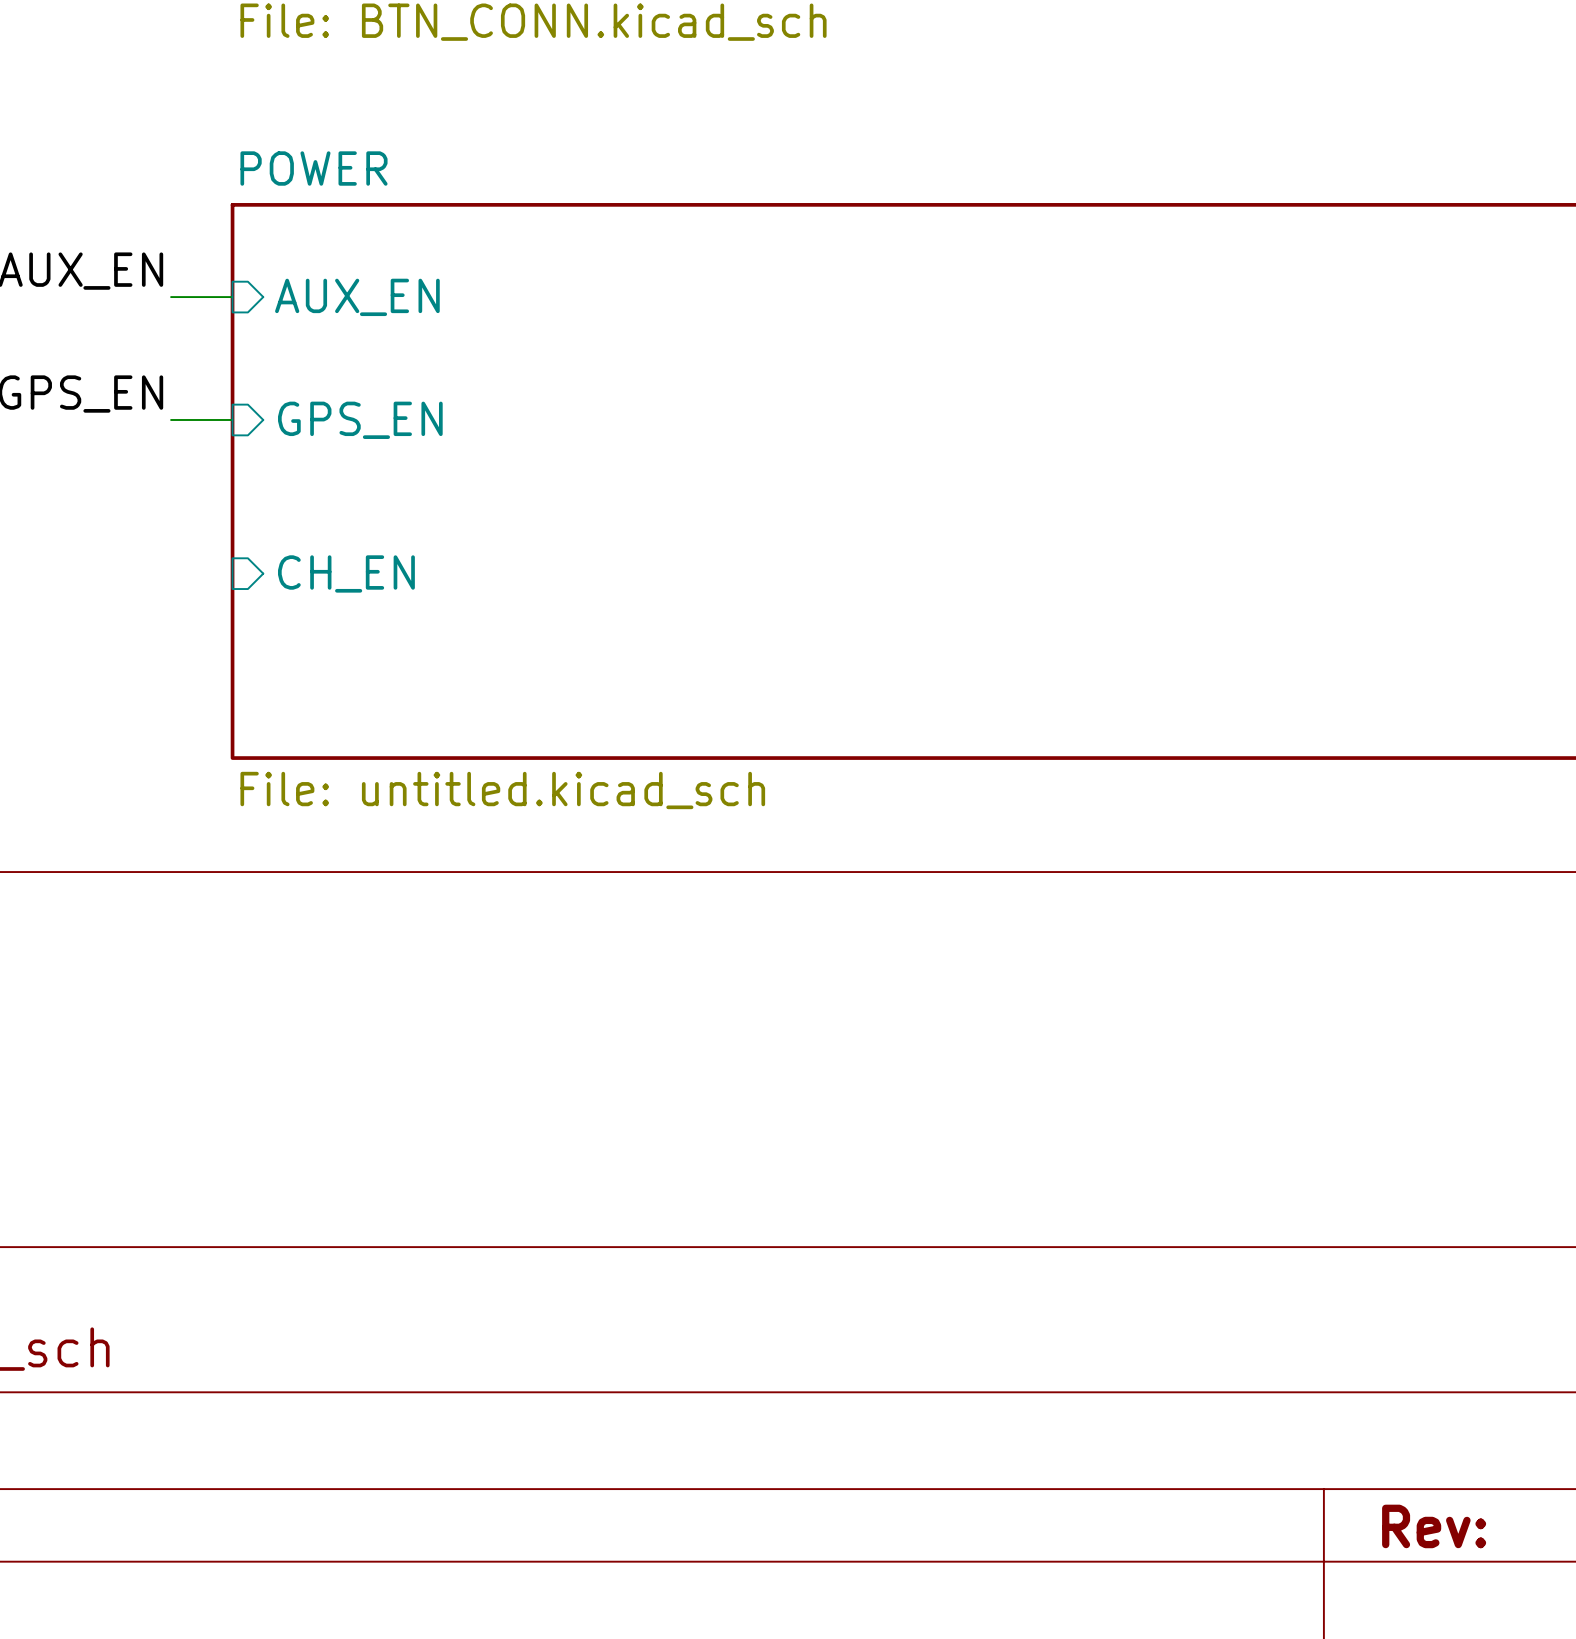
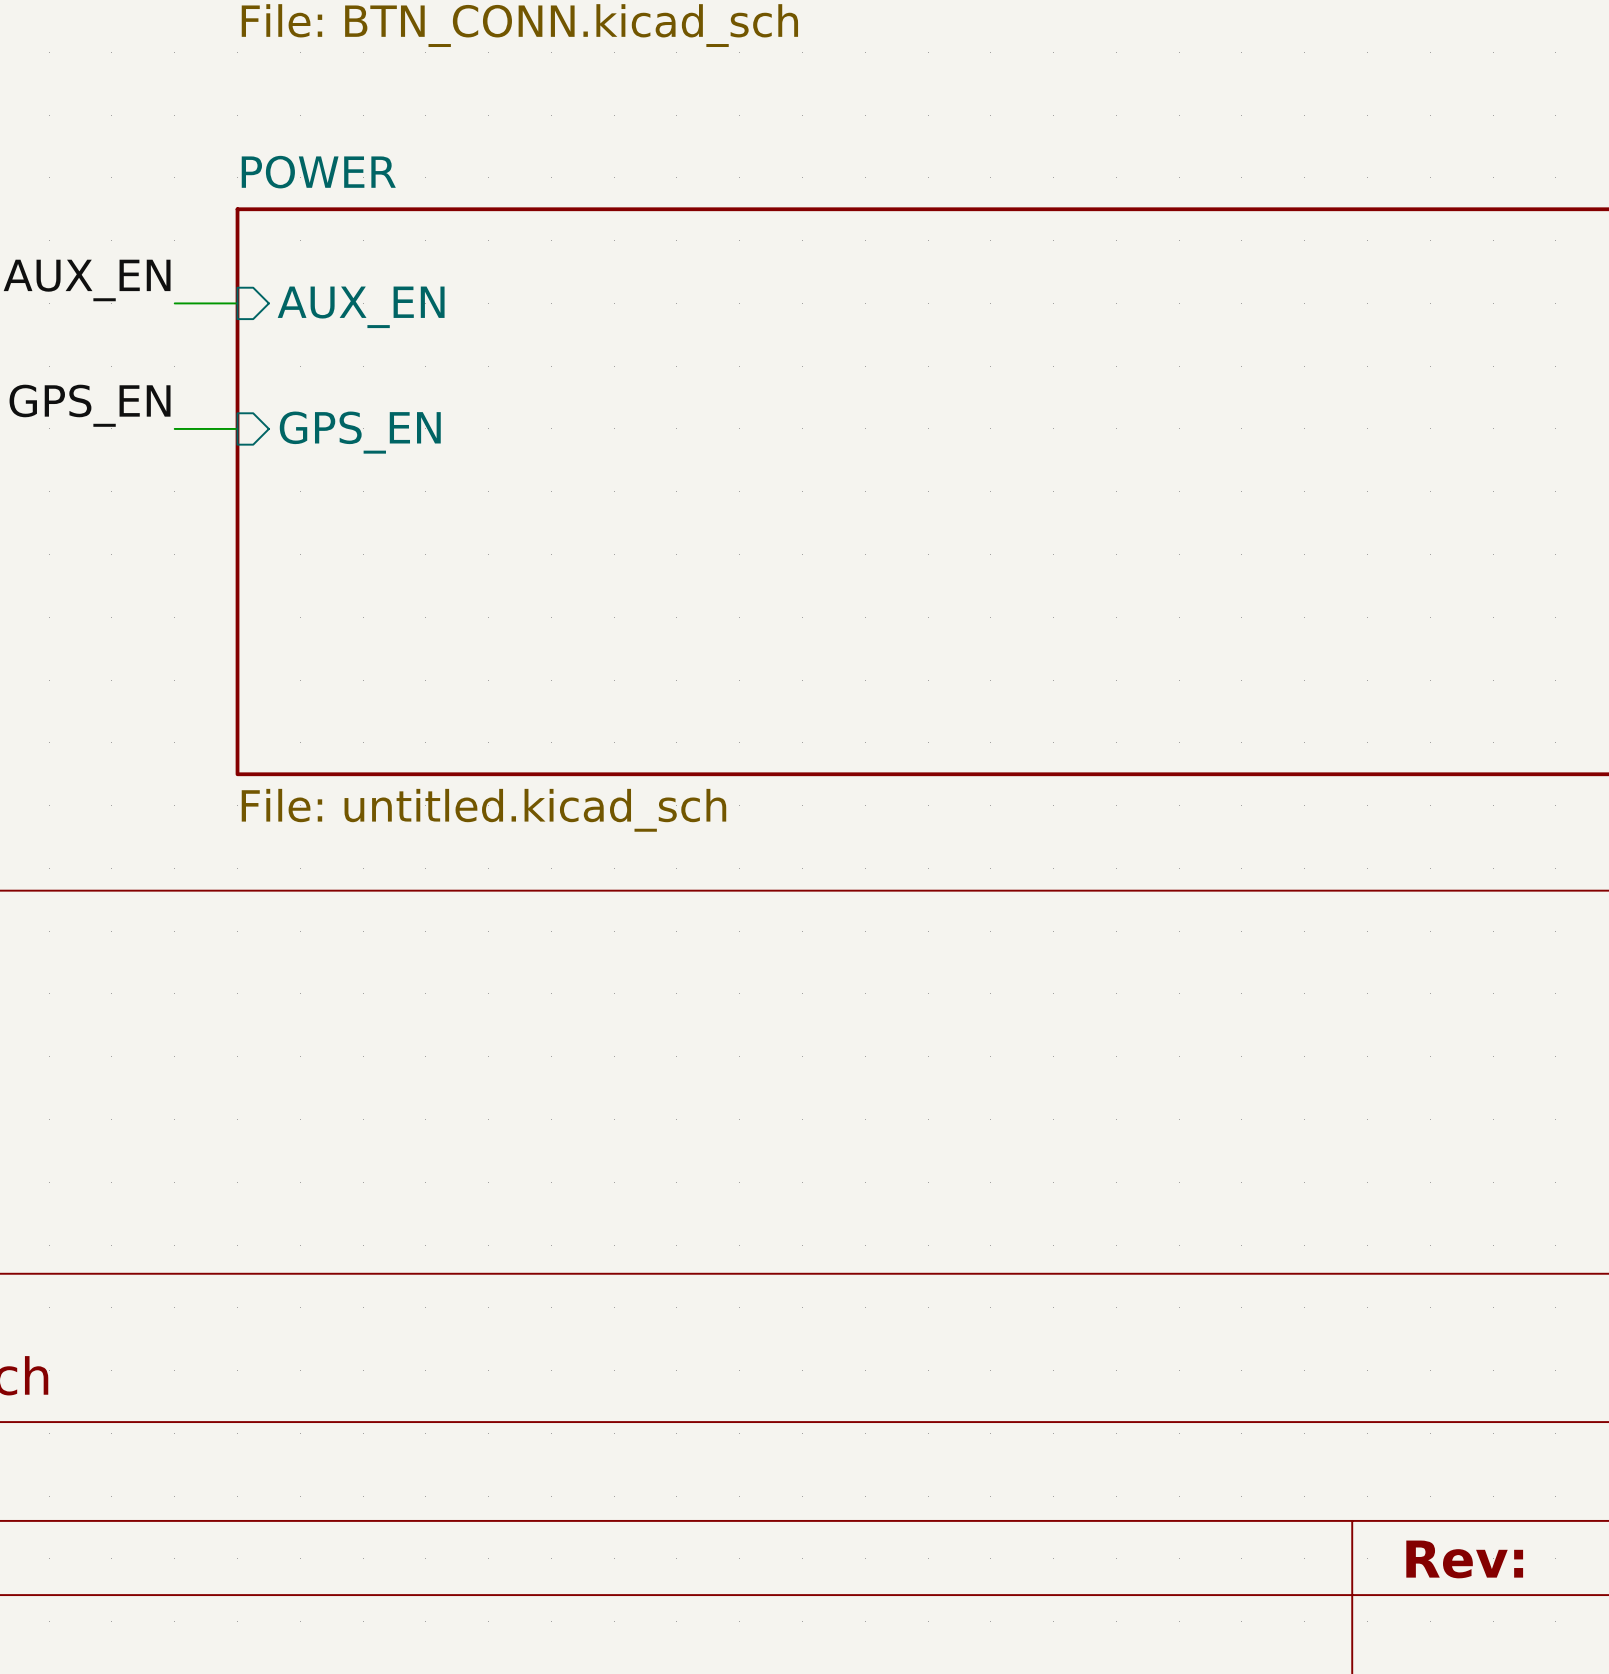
sheet pin: CH_EN (346, 573) -> none

